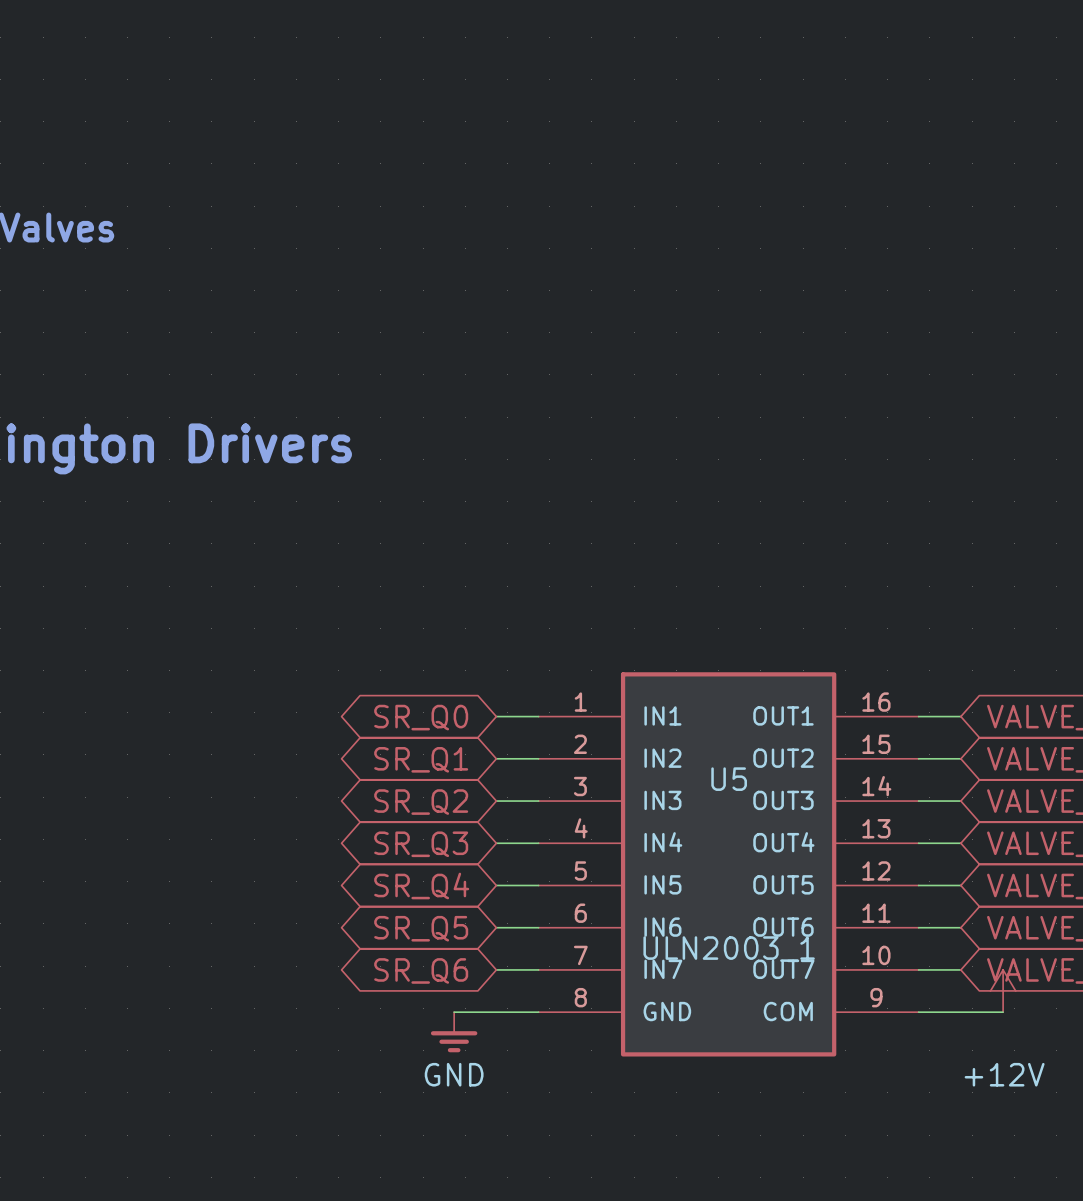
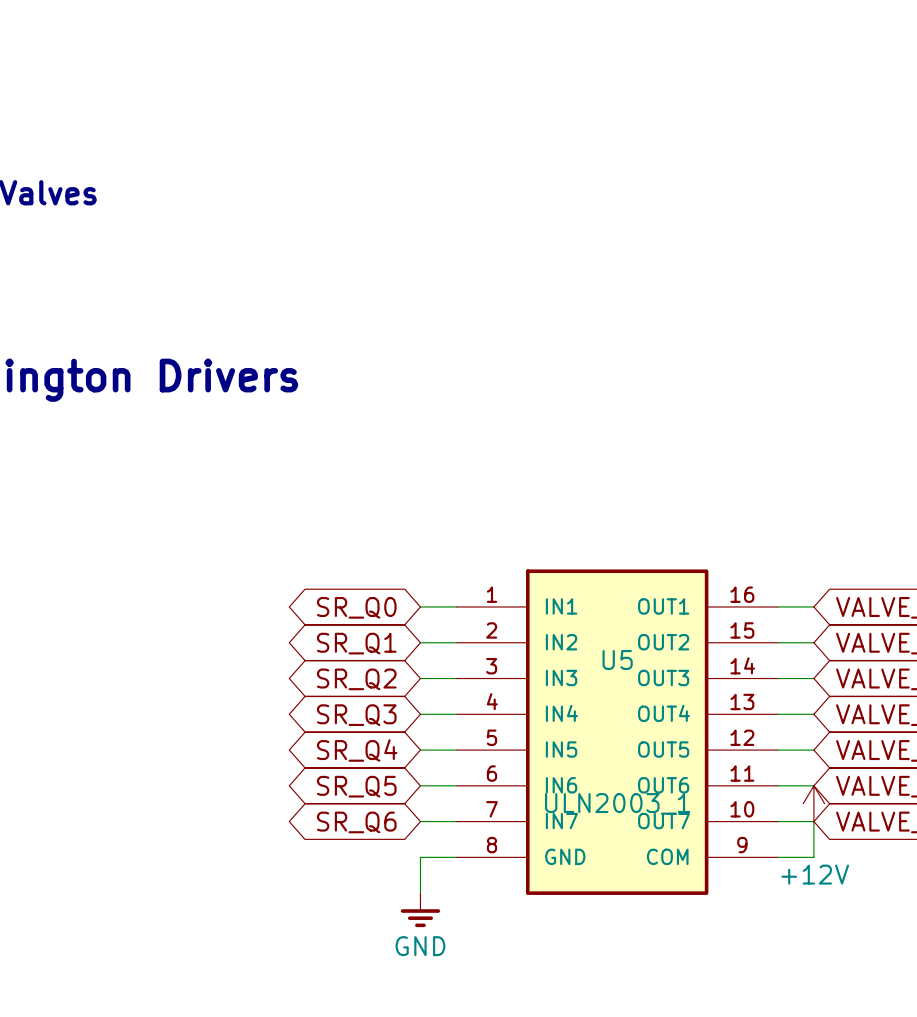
power symbol position: +12V (1003, 991) -> +12V (813, 803)
wire: (454, 1012) (496, 1012) -> (420, 893) (420, 857)
wire: (960, 1012) (1003, 1012) -> (813, 857) (813, 821)
power symbol position: GND (454, 1032) -> GND (420, 910)

